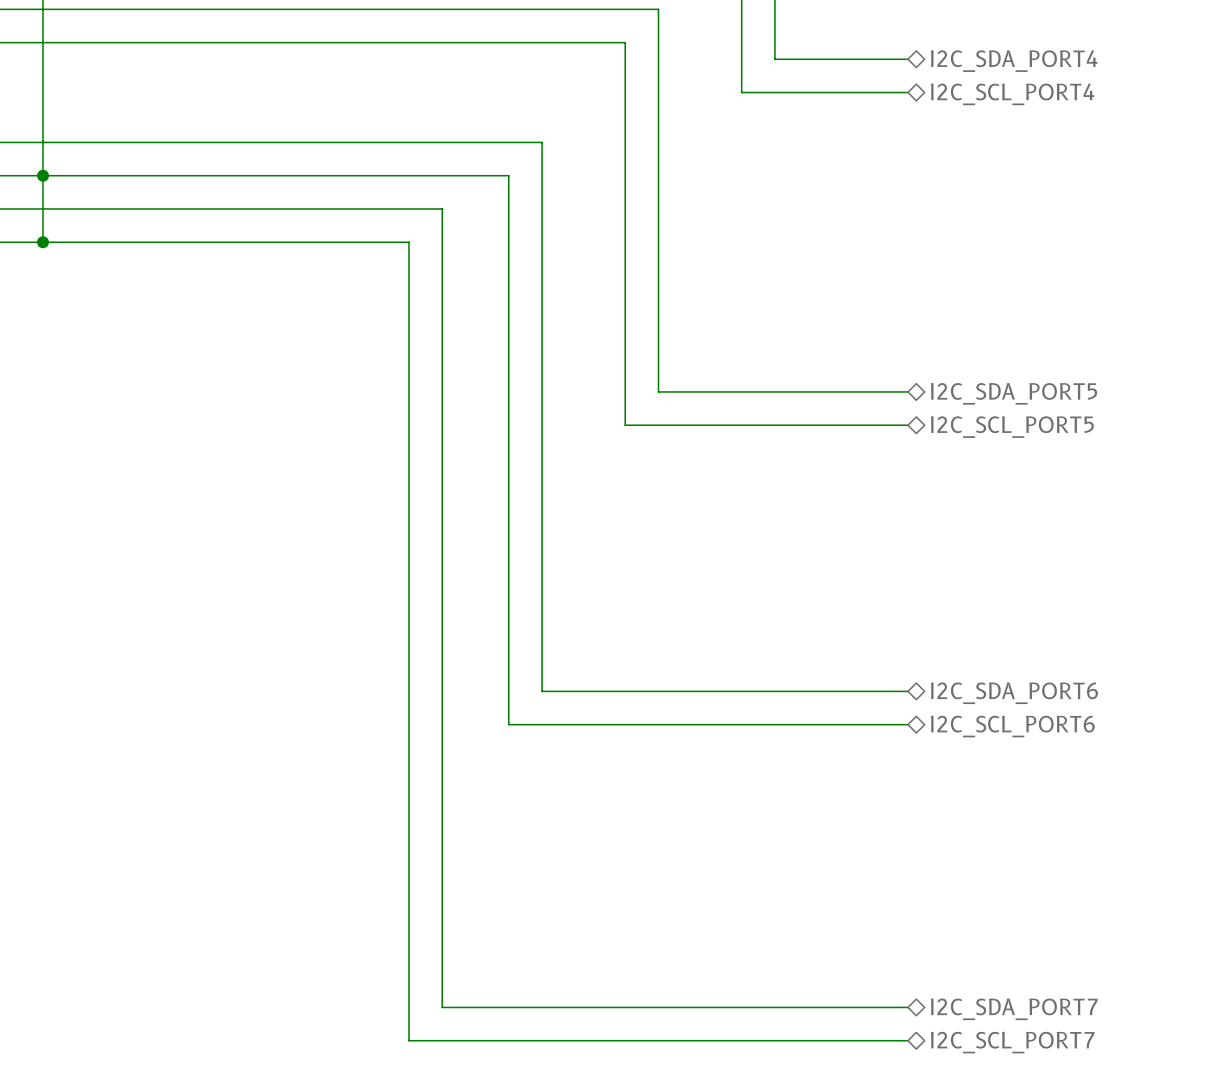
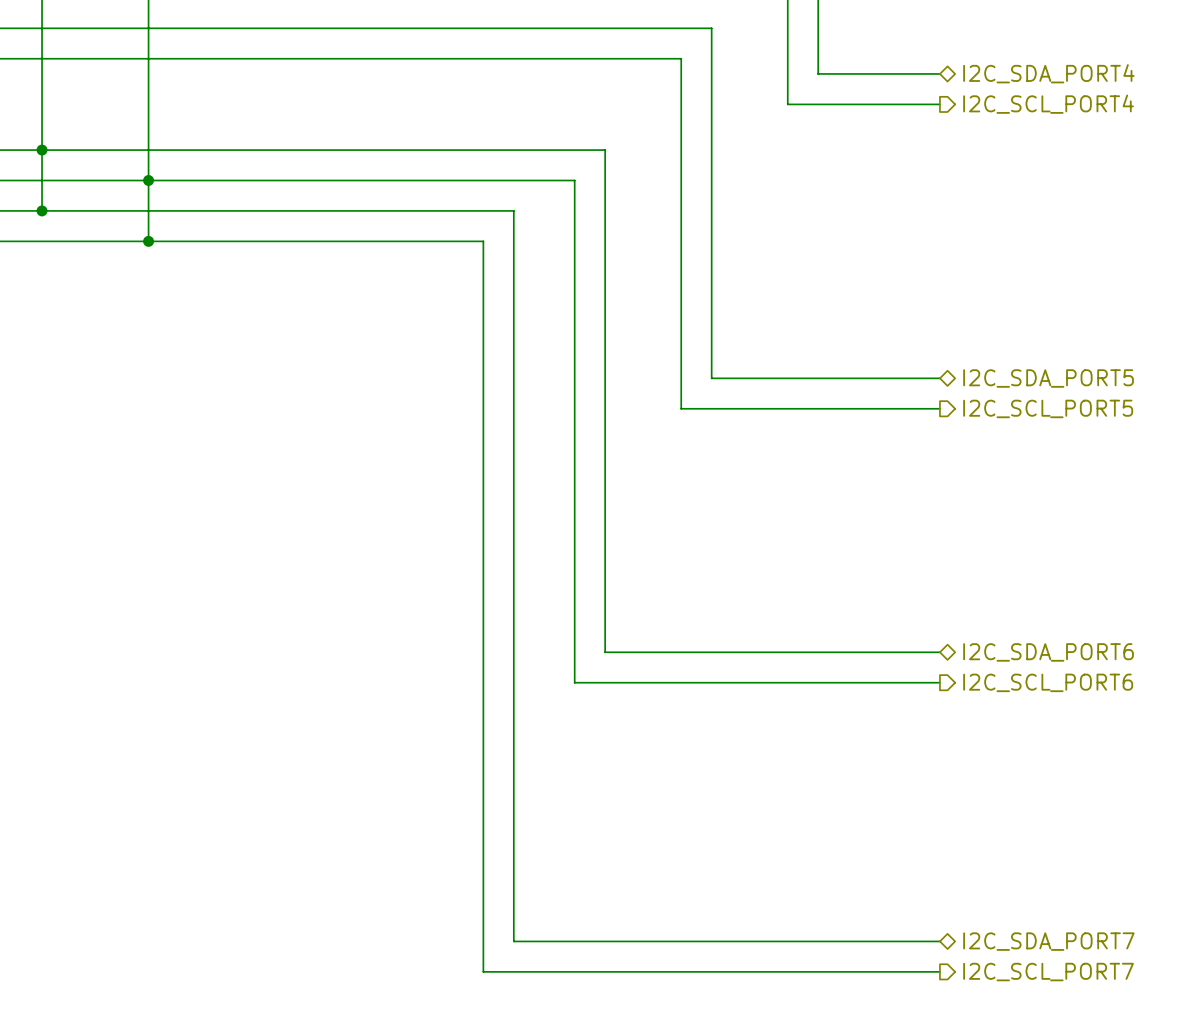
hierarchical label shape: bidirectional (1012, 94) -> output (1048, 104)
hierarchical label shape: bidirectional (1012, 427) -> output (1048, 408)
hierarchical label shape: bidirectional (1012, 726) -> output (1048, 682)
hierarchical label shape: bidirectional (1012, 1042) -> output (1048, 972)

